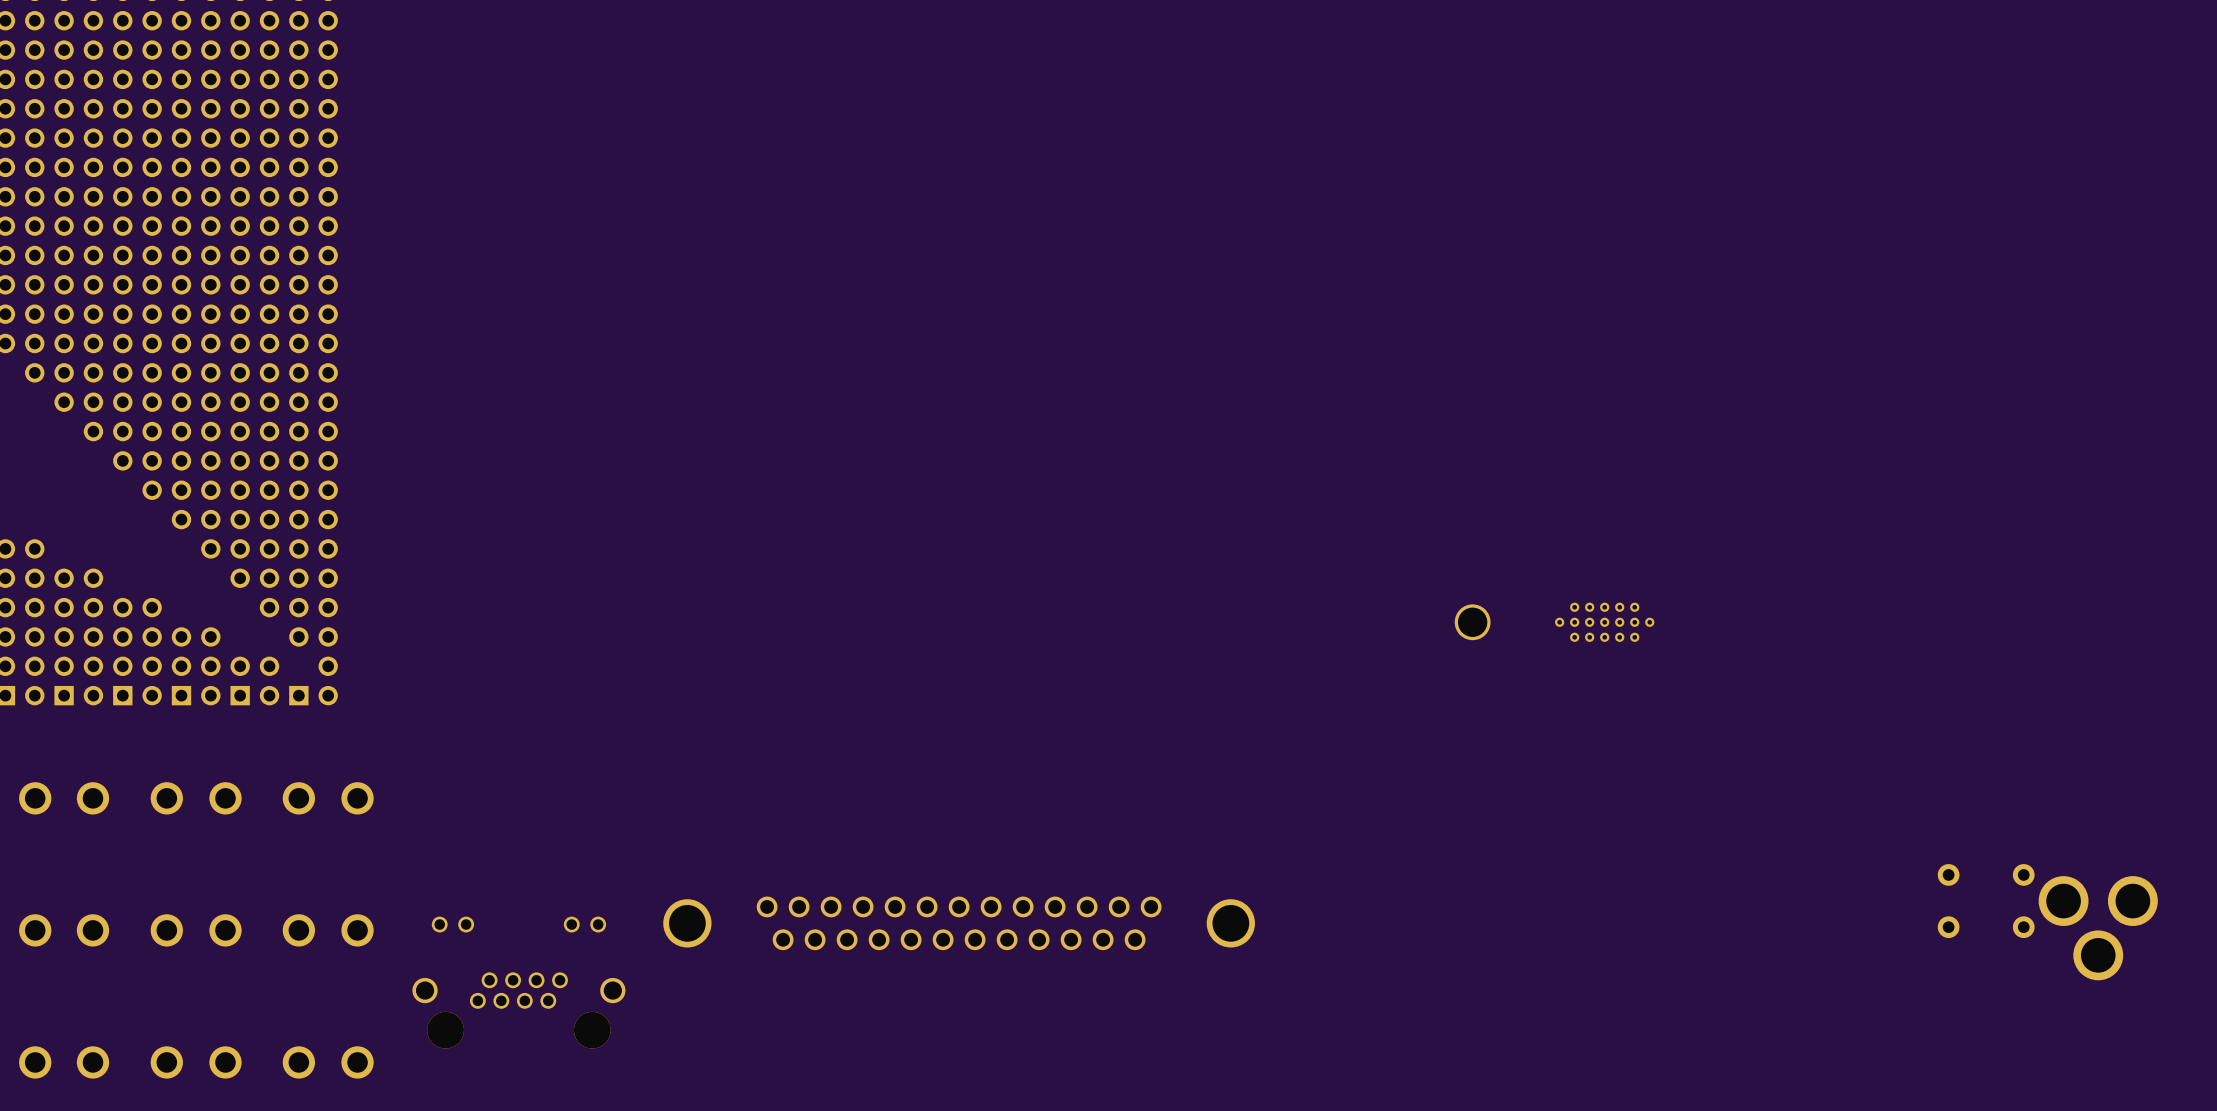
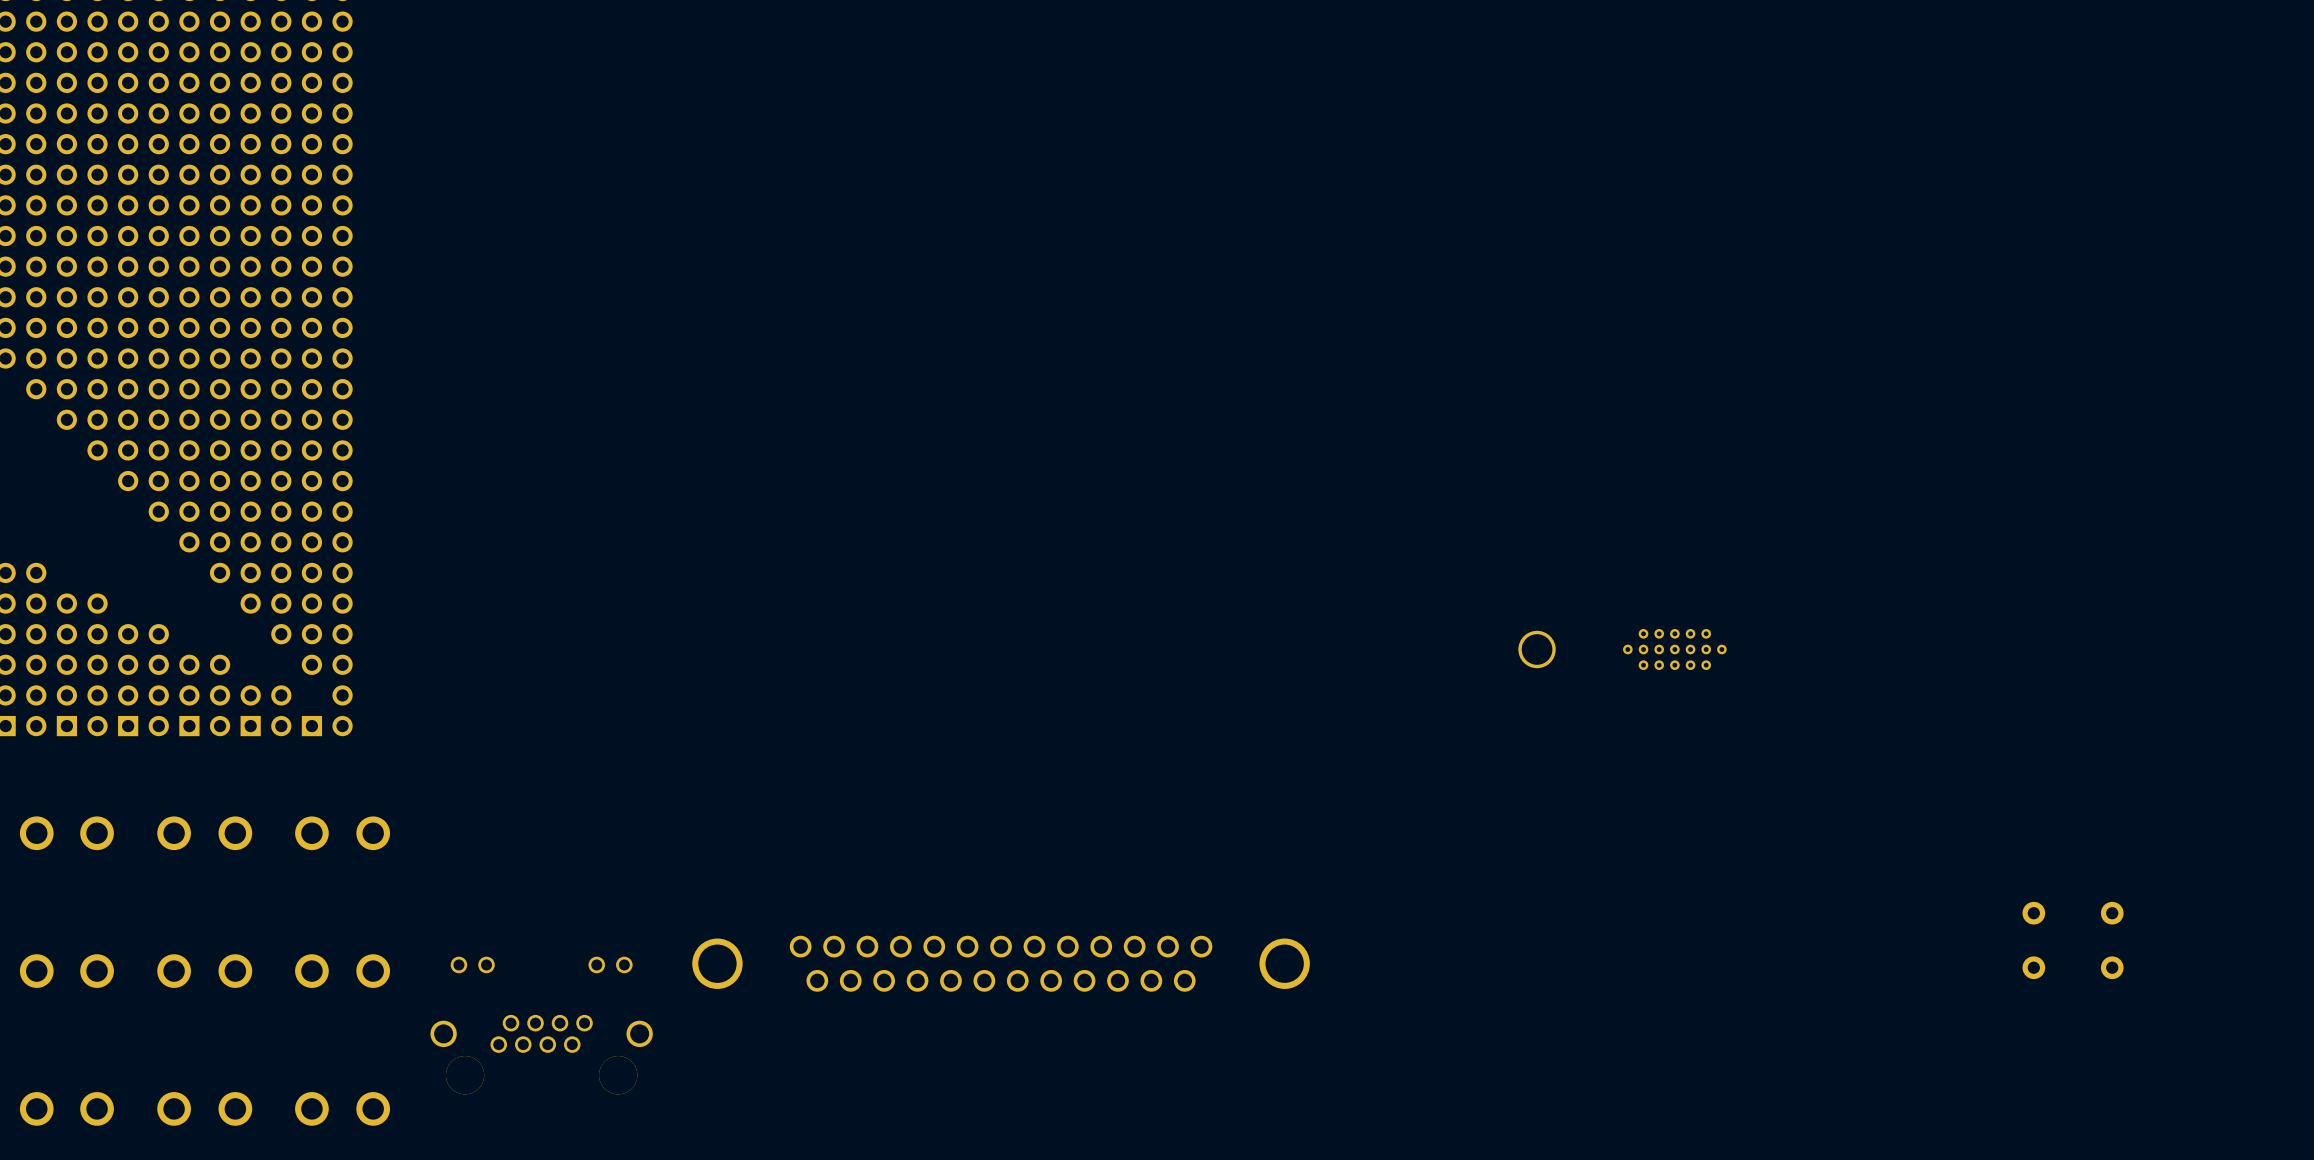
part: (2098, 928) -> none

